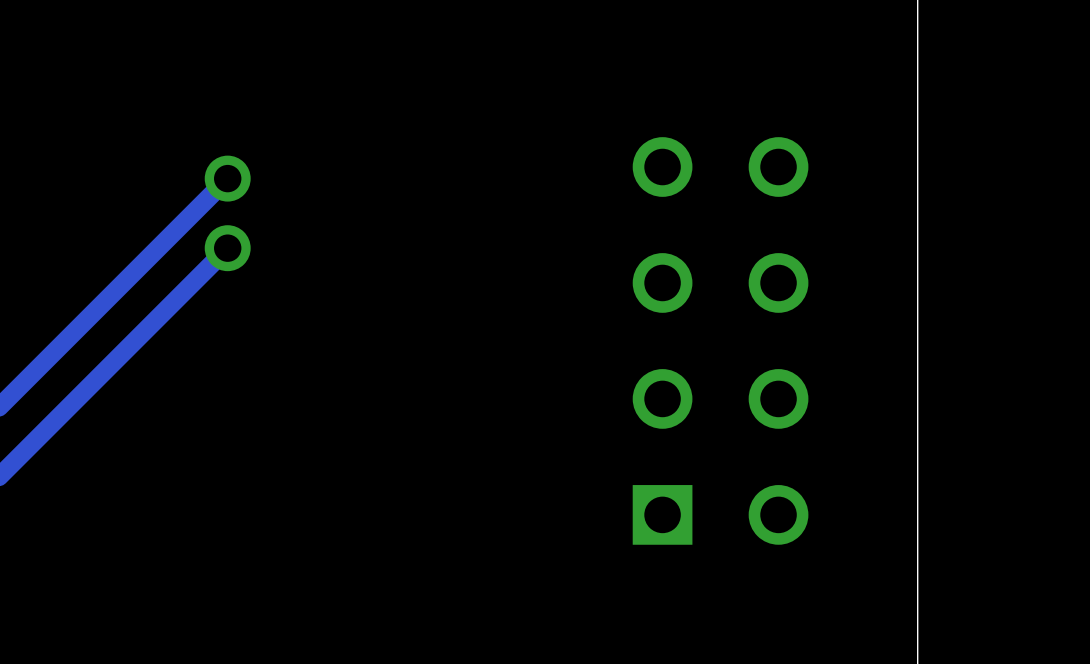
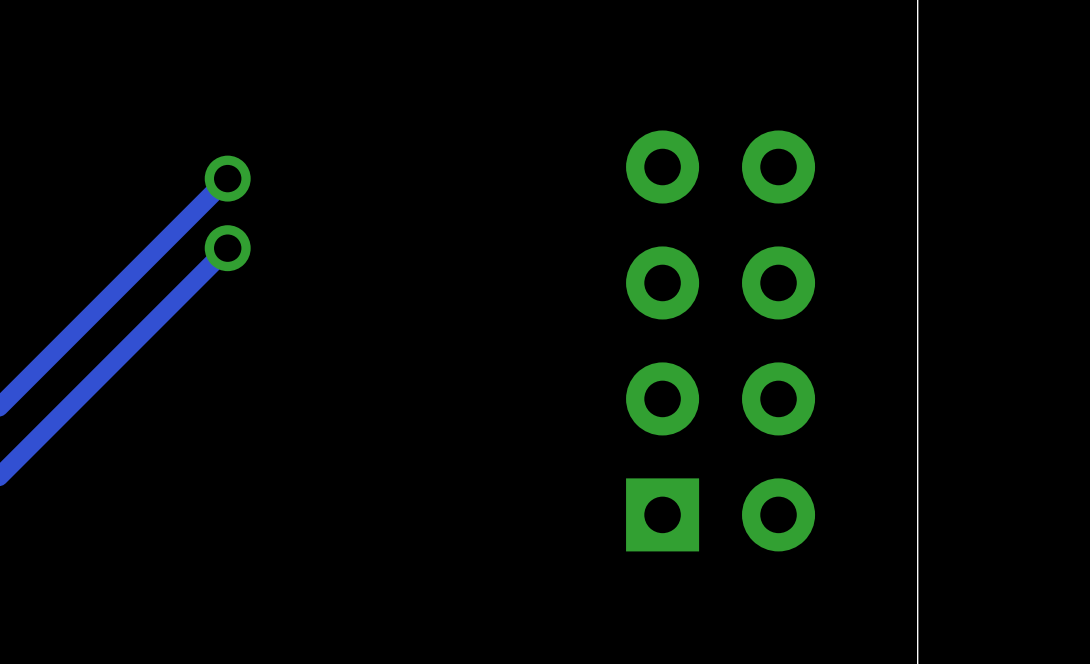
part footprint: [632, 137, 809, 545] -> [626, 130, 816, 552]

